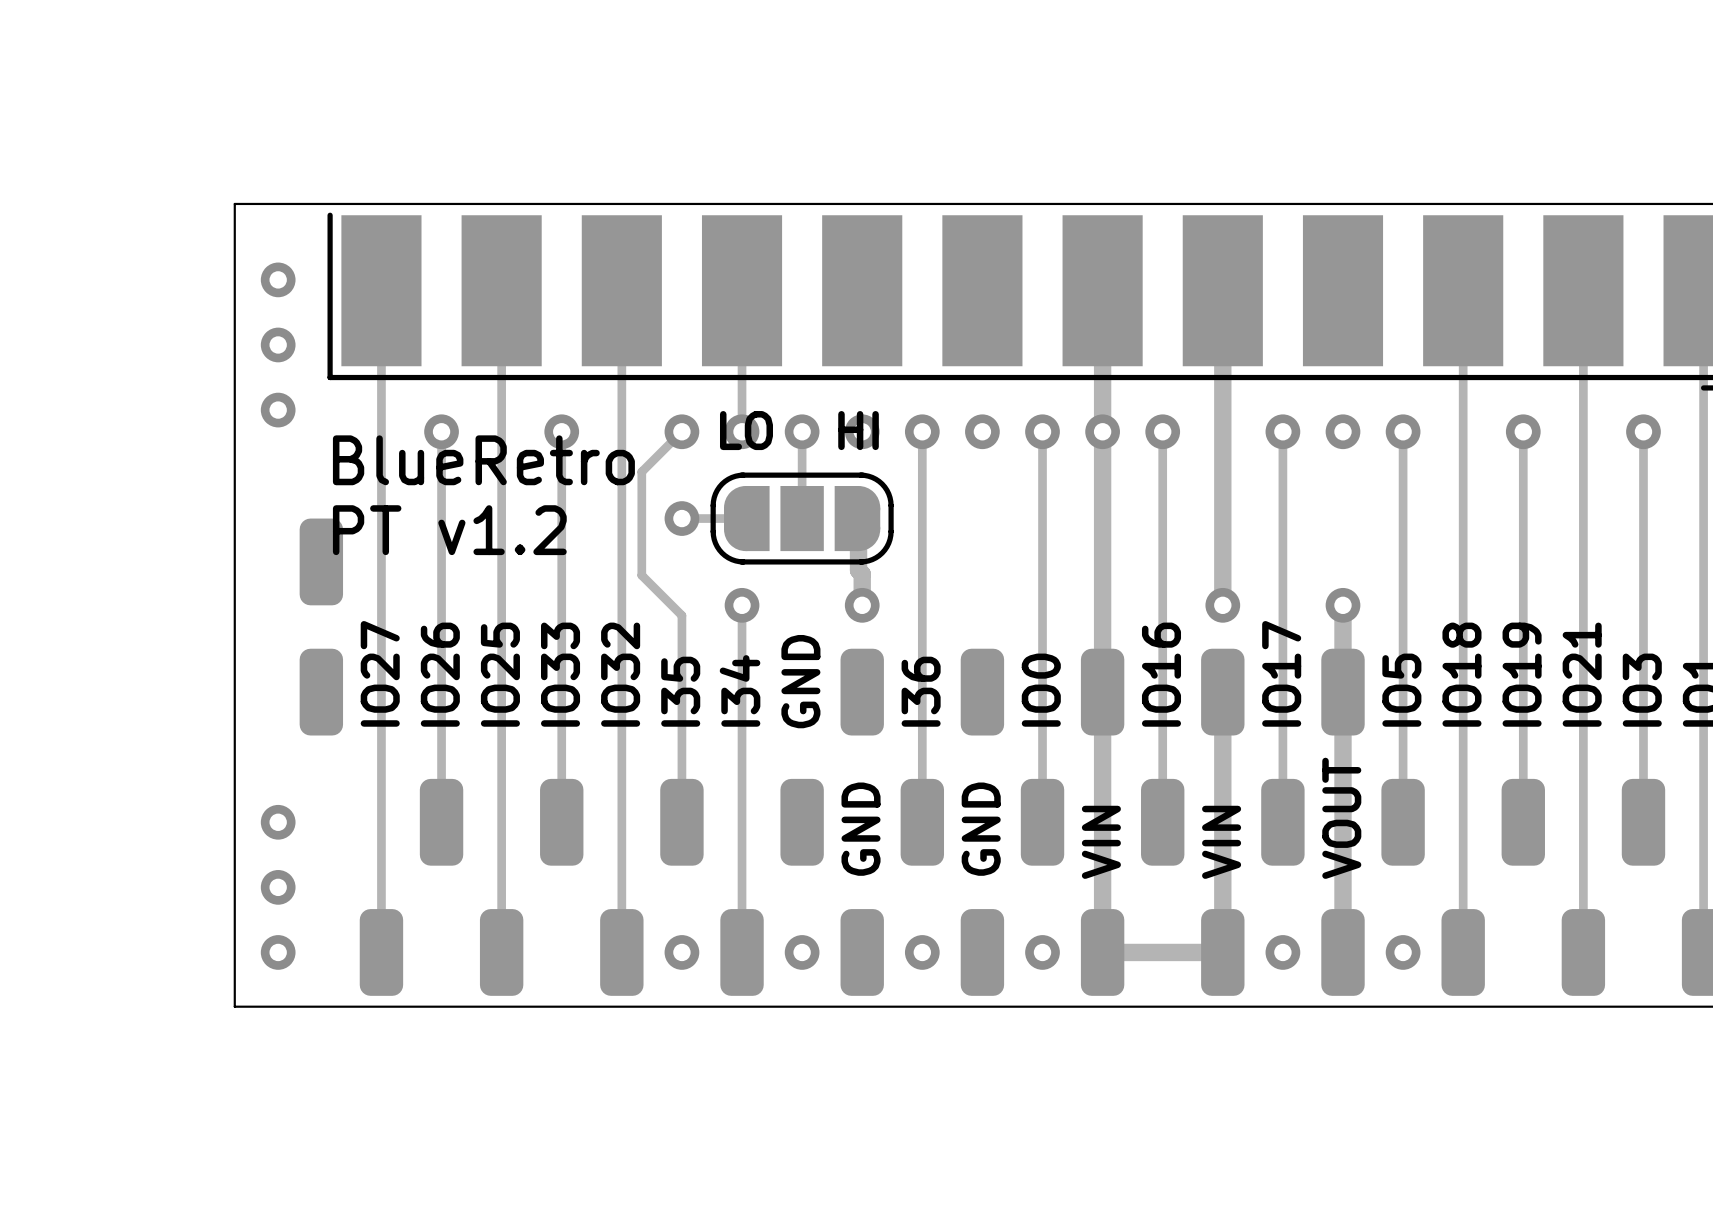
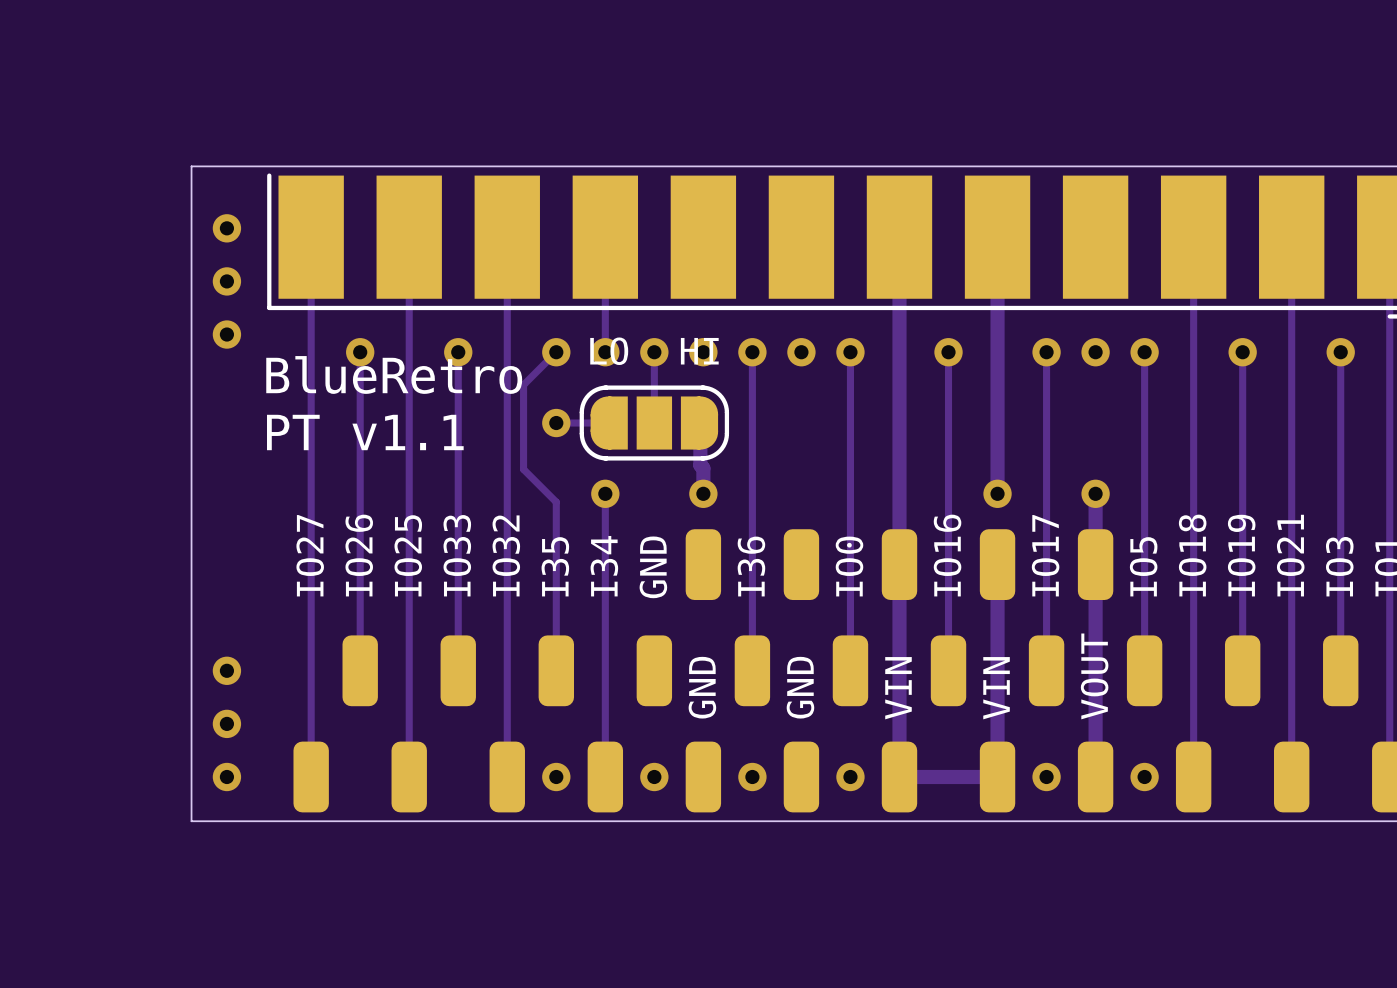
via: (1102, 431) -> none
text: PT v1.2 (449, 530) -> PT v1.1 (365, 432)
part: (321, 561) -> none
part: (321, 692) -> none

